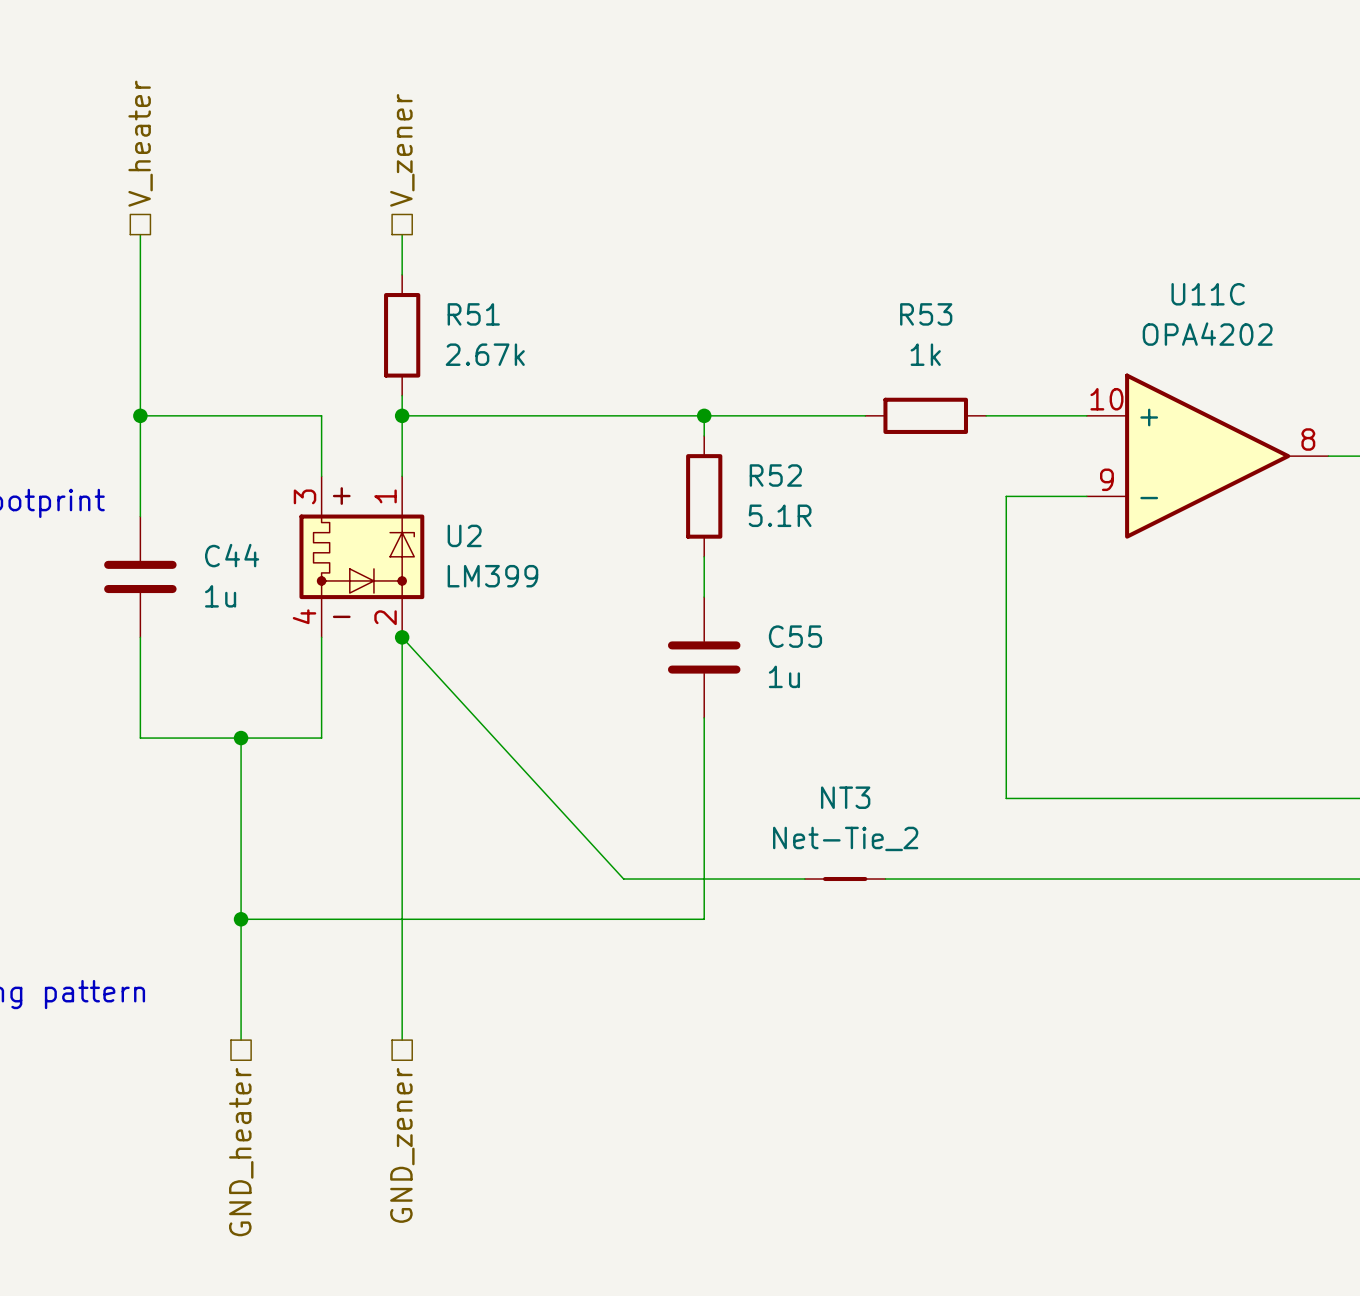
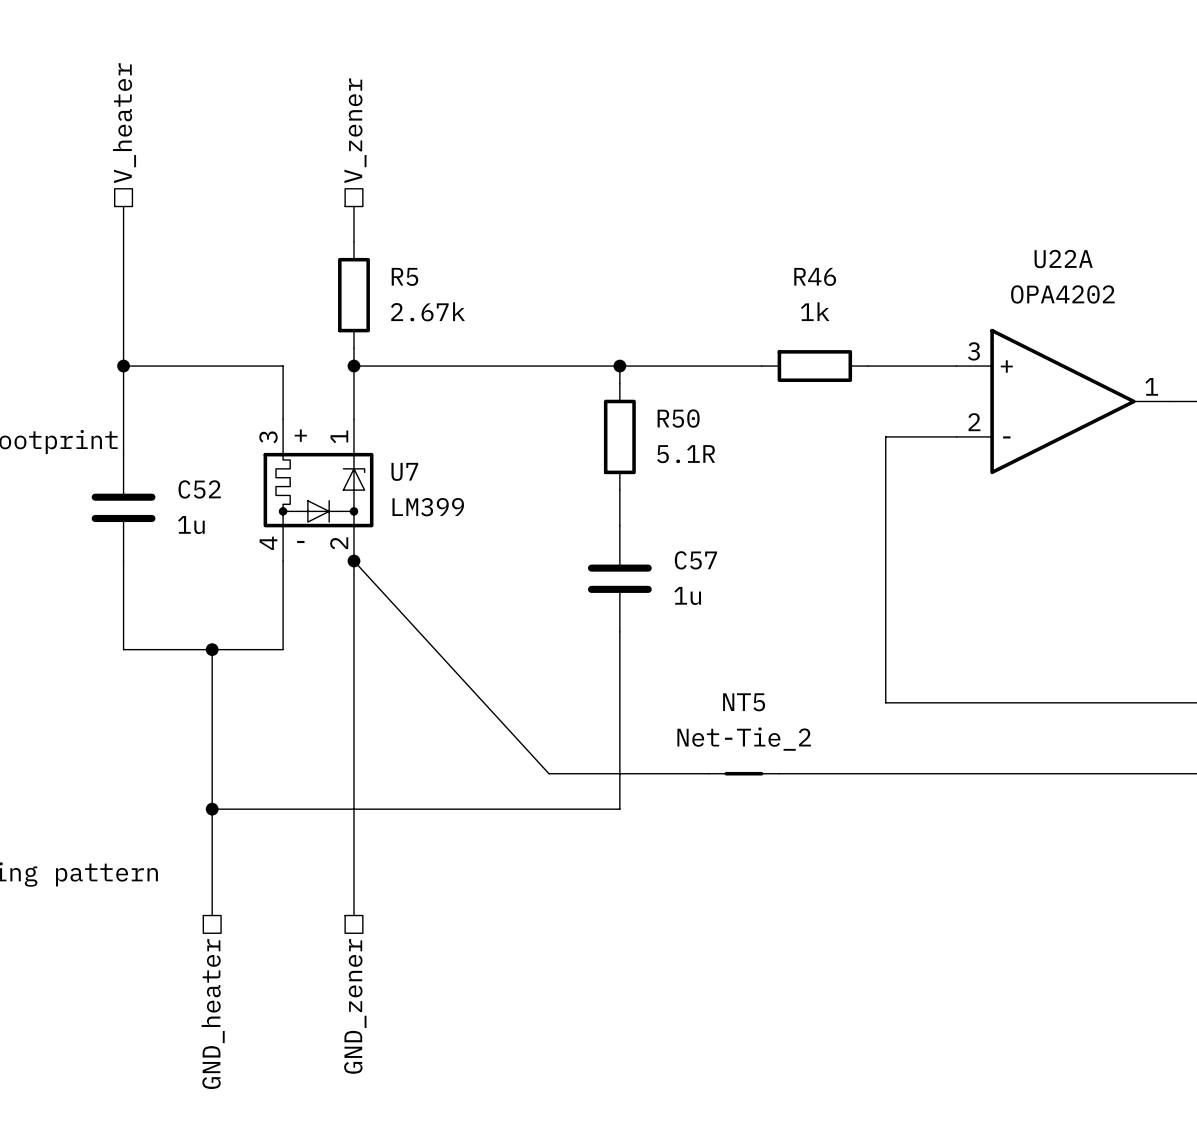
U11C name: U11C (1208, 294) -> U22A (1063, 259)
R51 name: R51 (473, 314) -> R5 (404, 276)
R53 name: R53 (926, 314) -> R46 (815, 276)
U11C pin number: 10 (1106, 399) -> 3 (973, 351)
U11C pin number: 8 (1308, 439) -> 1 (1151, 386)
R52 name: R52 (775, 475) -> R50 (678, 418)
U11C pin number: 9 (1106, 479) -> 2 (974, 422)
U2 name: U2 (464, 535) -> U7 (404, 471)
C44 name: C44 (232, 555) -> C52 (199, 489)
C55 name: C55 (795, 636) -> C57 (695, 560)
NT3 name: NT3 (845, 797) -> NT5 (744, 702)

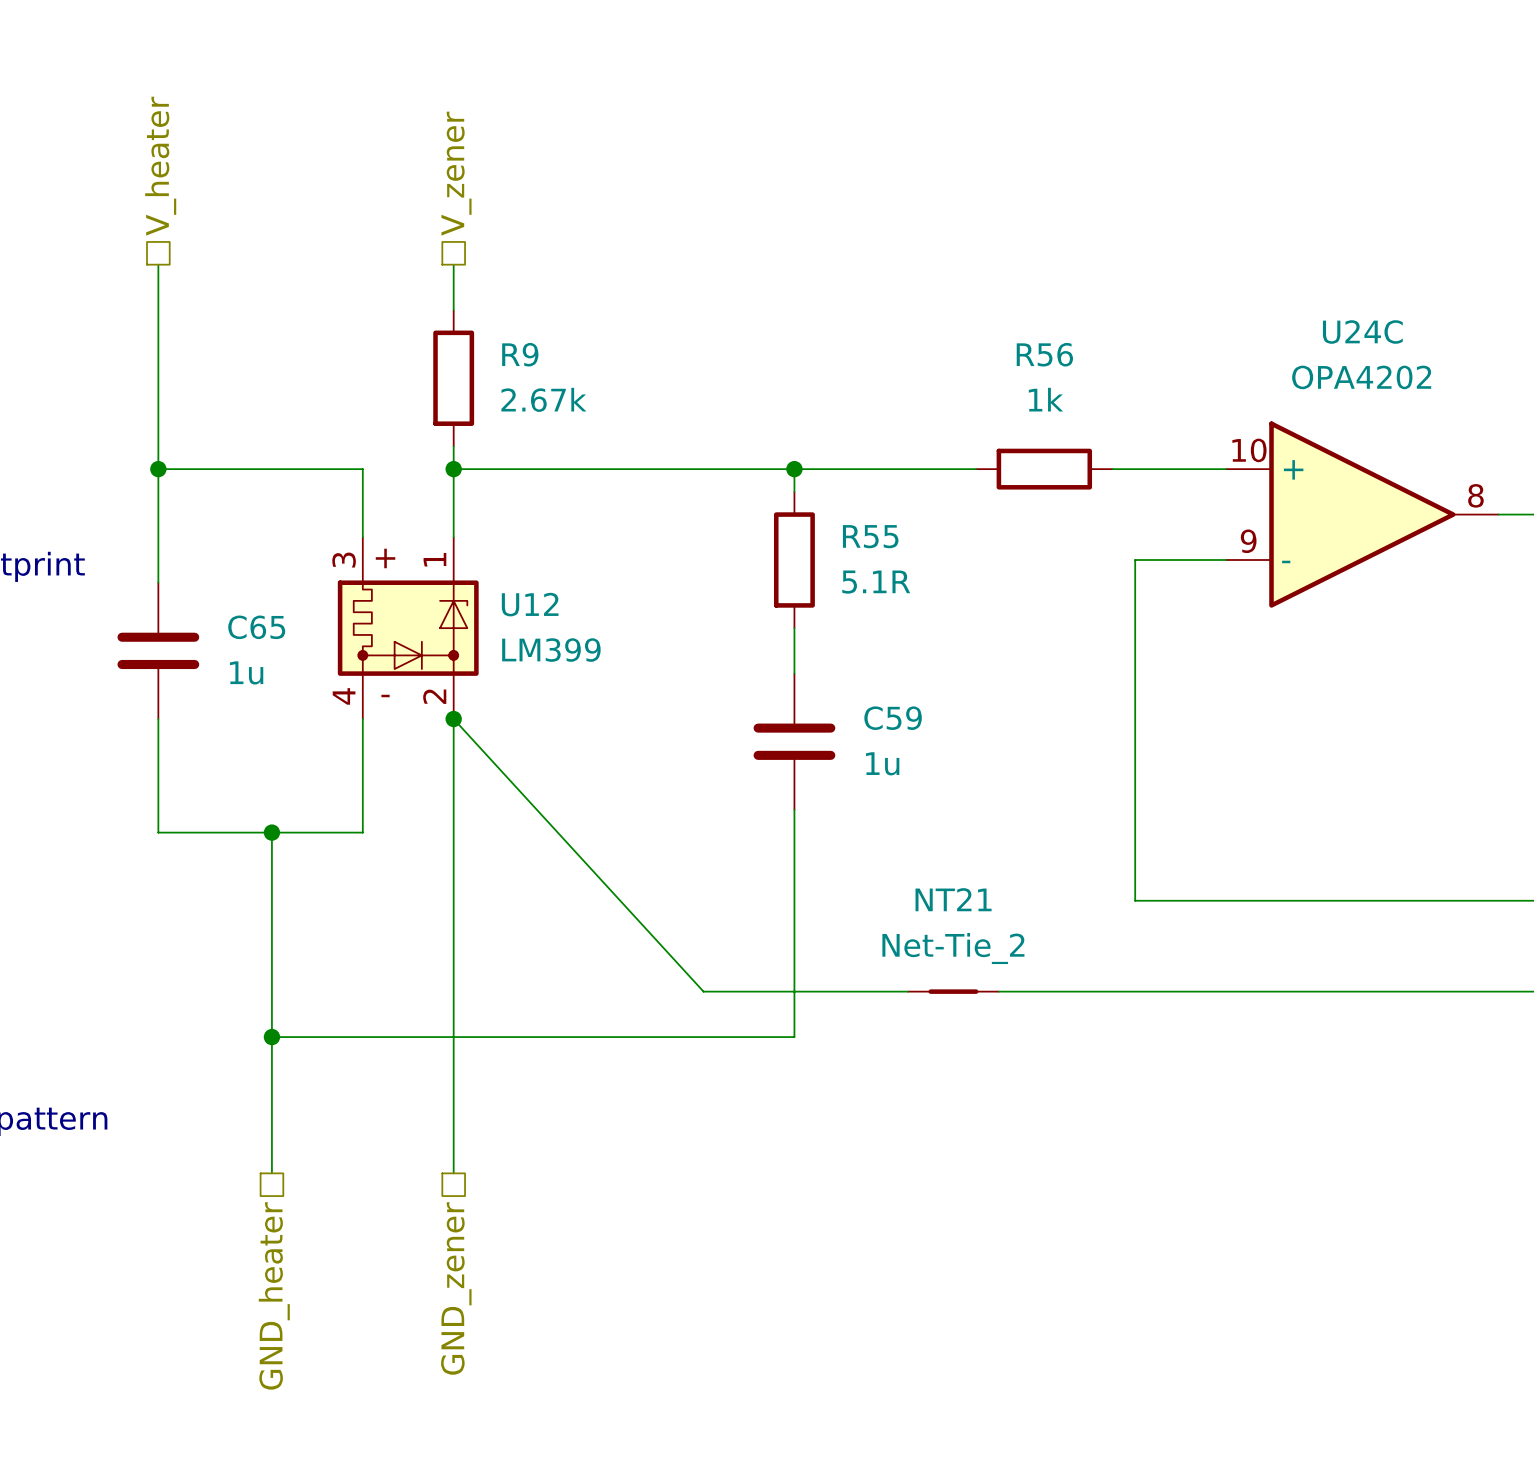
U22A name: U22A (1063, 259) -> U24C (1362, 331)
R5 name: R5 (404, 276) -> R9 (520, 354)
R46 name: R46 (815, 276) -> R56 (1044, 354)
U22A pin number: 3 (973, 351) -> 10 (1249, 450)
U22A pin number: 1 (1151, 386) -> 8 (1475, 495)
R50 name: R50 (678, 418) -> R55 (870, 536)
U22A pin number: 2 (974, 422) -> 9 (1248, 541)
U7 name: U7 (404, 471) -> U12 (530, 604)
C52 name: C52 (199, 489) -> C65 (256, 627)
C57 name: C57 (695, 560) -> C59 (893, 718)
NT5 name: NT5 (744, 702) -> NT21 (953, 899)

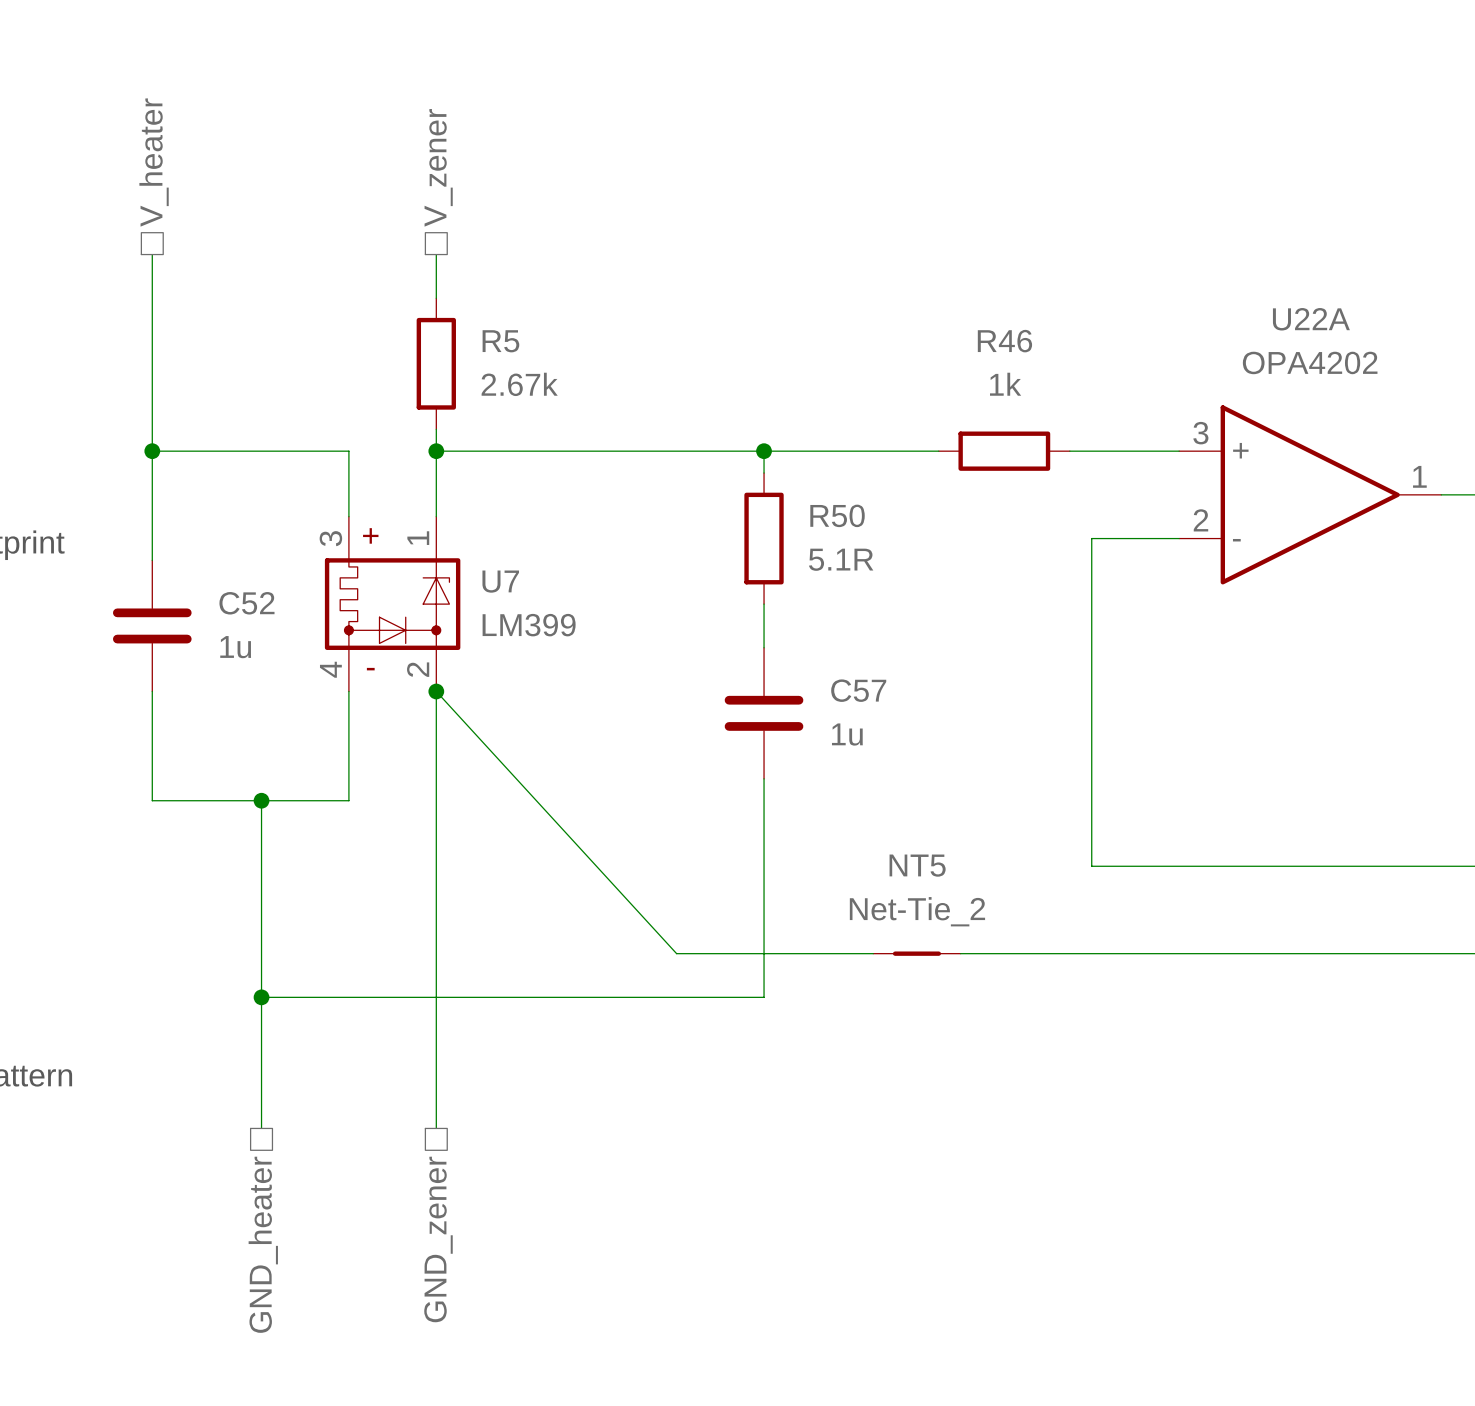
U24C name: U24C (1362, 331) -> U22A (1311, 319)
R9 name: R9 (520, 354) -> R5 (500, 341)
R56 name: R56 (1044, 354) -> R46 (1004, 341)
U24C pin number: 10 (1249, 450) -> 3 (1200, 433)
U24C pin number: 8 (1475, 495) -> 1 (1419, 476)
R55 name: R55 (870, 536) -> R50 (837, 515)
U24C pin number: 9 (1248, 541) -> 2 (1200, 520)
U12 name: U12 (530, 604) -> U7 (500, 581)
C65 name: C65 (256, 627) -> C52 (246, 603)
C59 name: C59 (893, 718) -> C57 (858, 690)
NT21 name: NT21 (953, 899) -> NT5 (917, 865)

